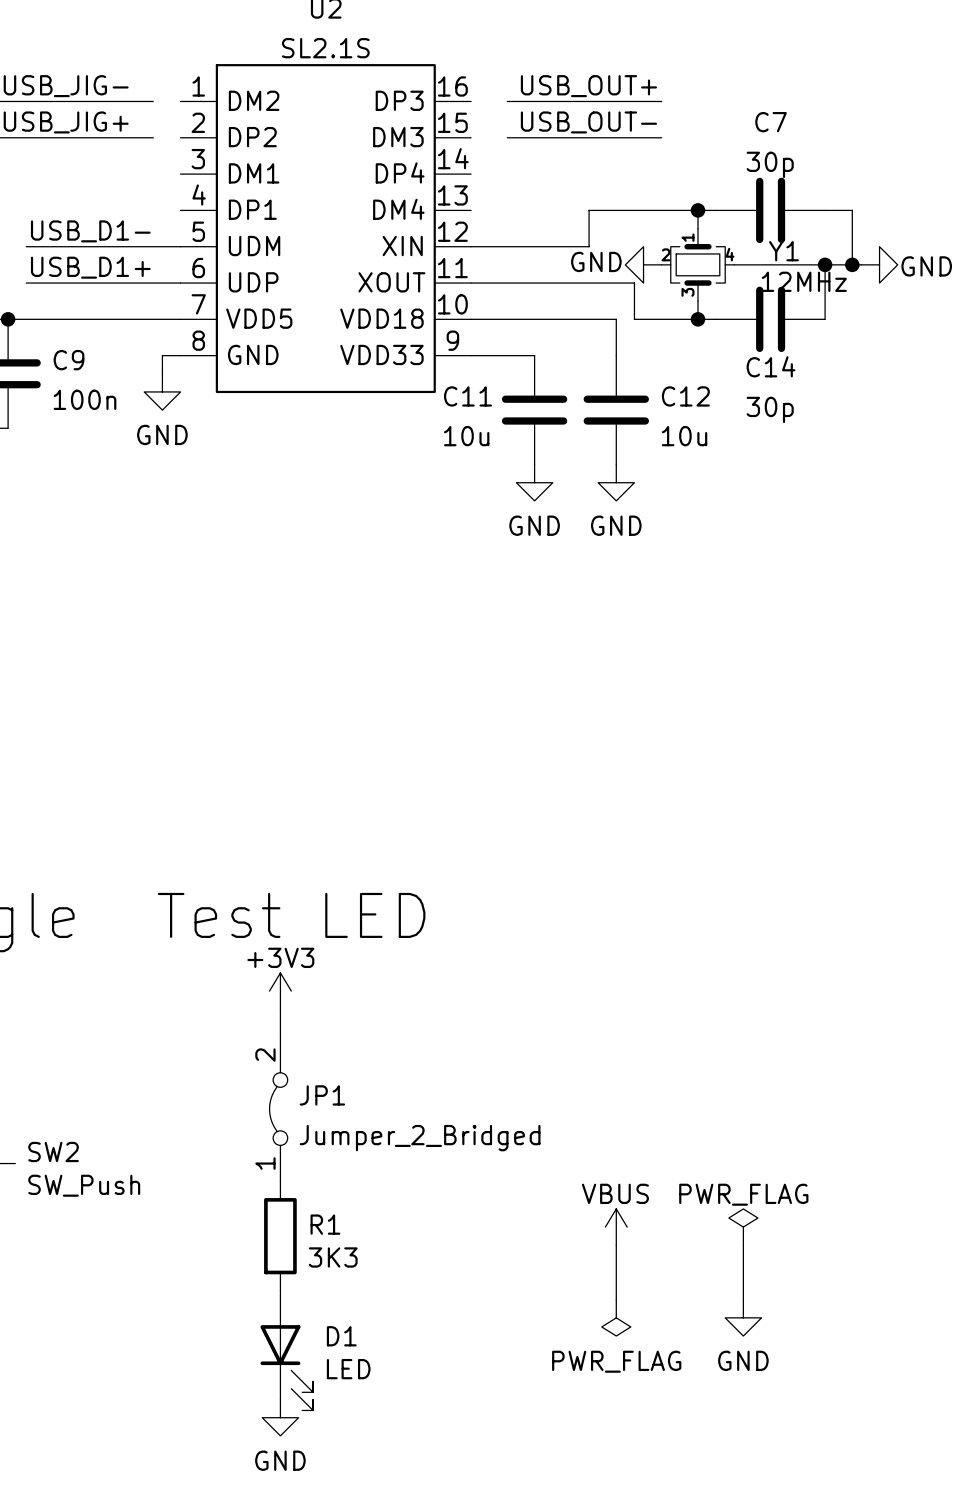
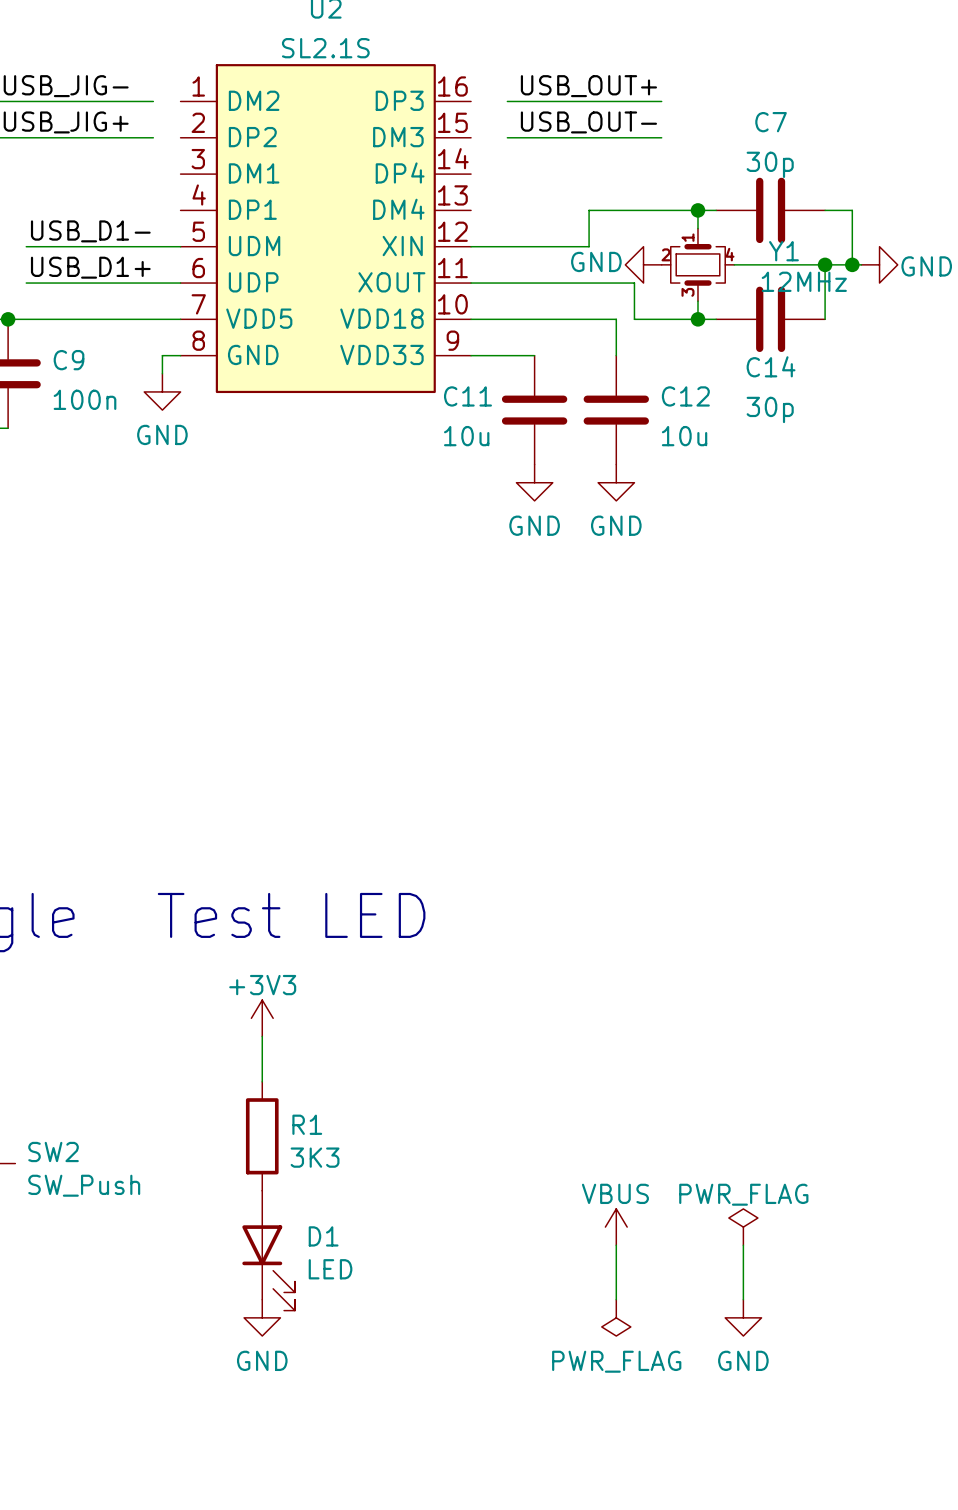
power symbol position: +3V3 (280, 991) -> +3V3 (262, 1018)
wire: (280, 1009) (280, 1036) -> none
wire: none -> (262, 1036) (262, 1081)
JP1: Jumper_2_Bridged (278, 1109) -> none
R1 position: (280, 1236) -> (262, 1136)
D1 position: (286, 1350) -> (268, 1250)
power symbol position: GND (280, 1417) -> GND (262, 1317)

